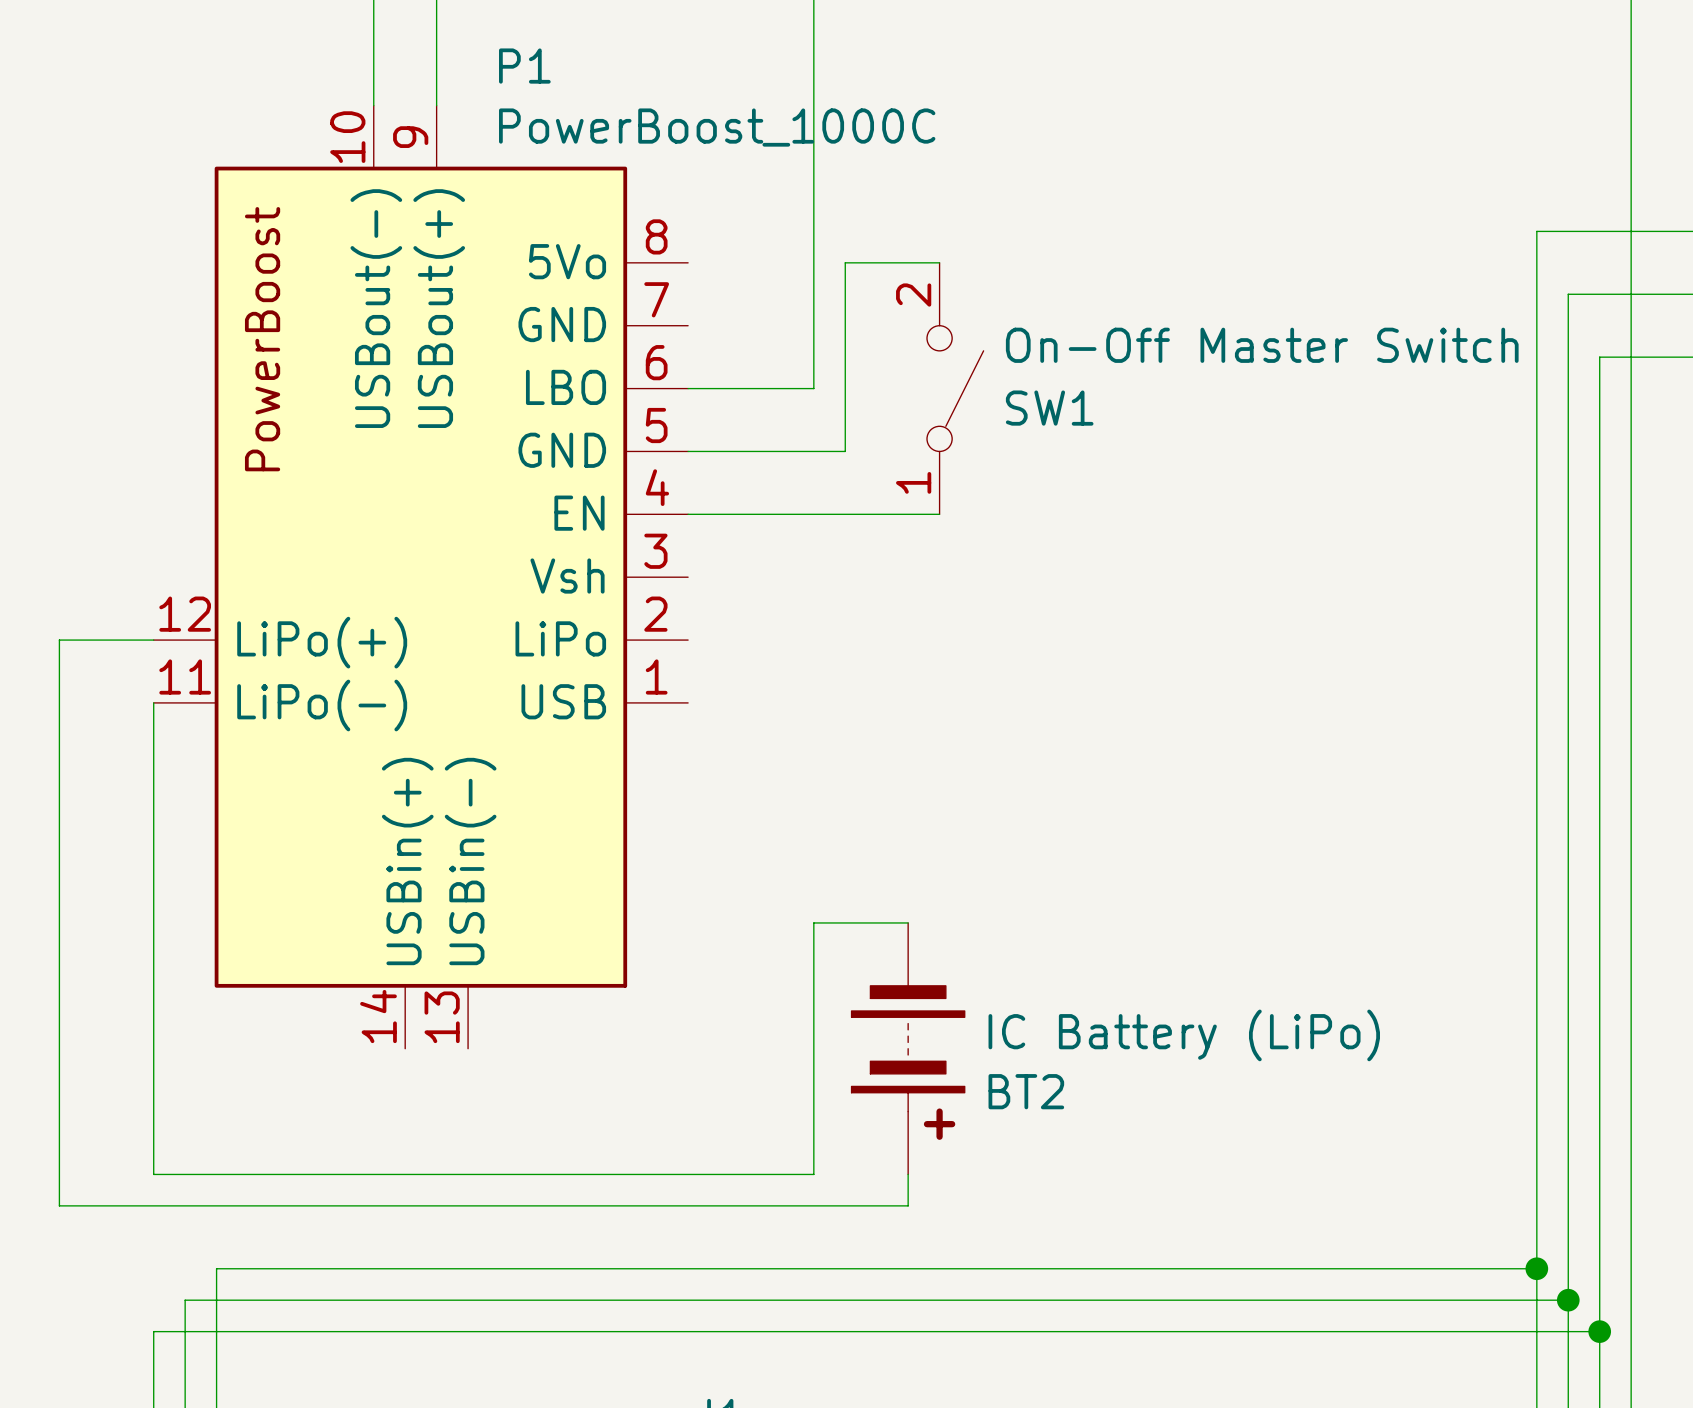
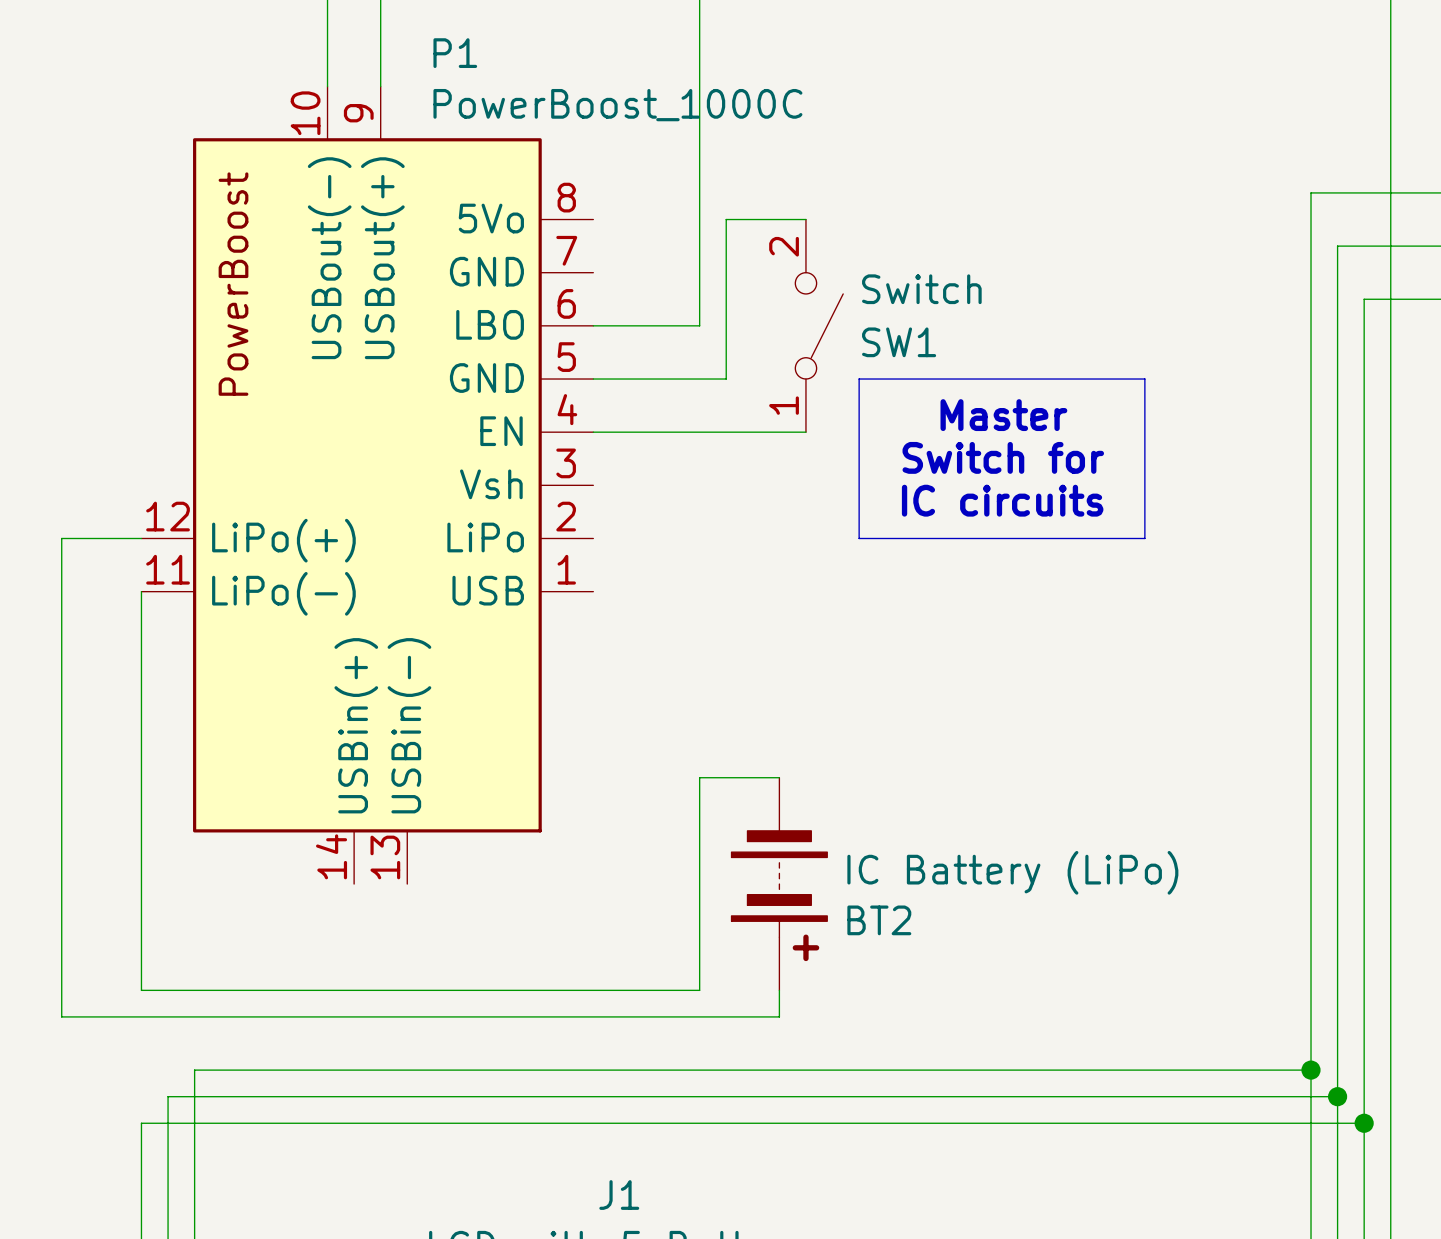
SW1 value: On-Off Master Switch (1262, 345) -> Switch (921, 289)
line: none -> (859, 379) (1144, 379) (1144, 538) (859, 538) (859, 379)
text: none -> Master (1003, 415)
text: none -> Switch for (1003, 457)
text: none -> IC circuits (1002, 500)

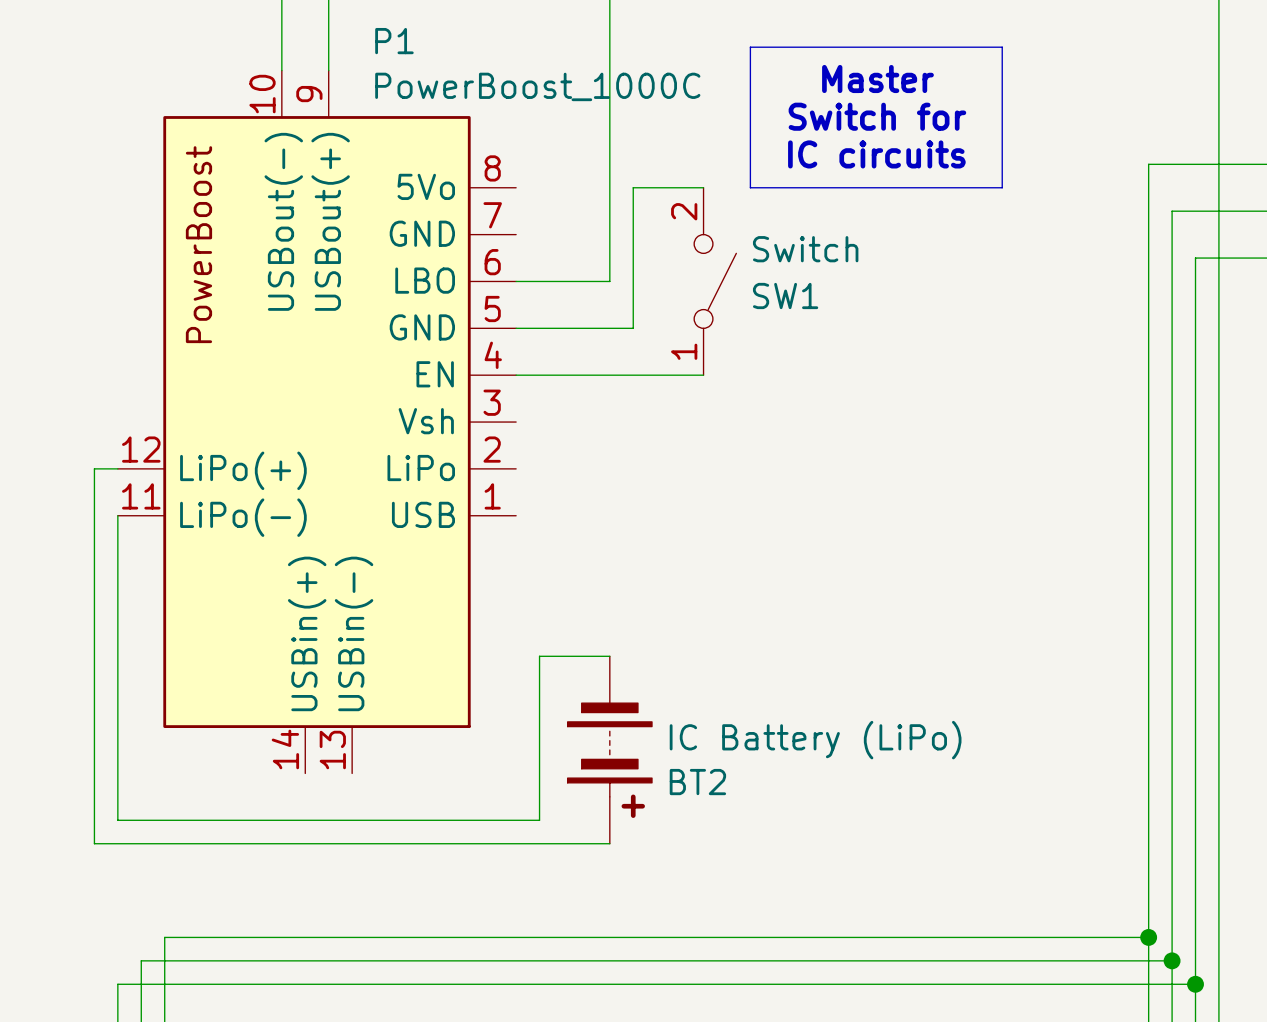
line: (859, 379) (1144, 379) (1144, 538) (859, 538) (859, 379) -> (750, 47) (1002, 47) (1002, 187) (750, 187) (750, 47)
text position: Master (1003, 415) -> Master (877, 79)
text position: Switch for (1003, 457) -> Switch for (877, 116)
text position: IC circuits (1002, 500) -> IC circuits (876, 154)
wire: (114, 538) (61, 538) (61, 1016) (779, 1016) (779, 990) -> (94, 468) (94, 843) (609, 843)
wire: (779, 777) (699, 777) (699, 990) (141, 990) (141, 937) -> (609, 656) (539, 656) (539, 820) (117, 820)
BT2 position: (779, 884) -> (609, 750)

